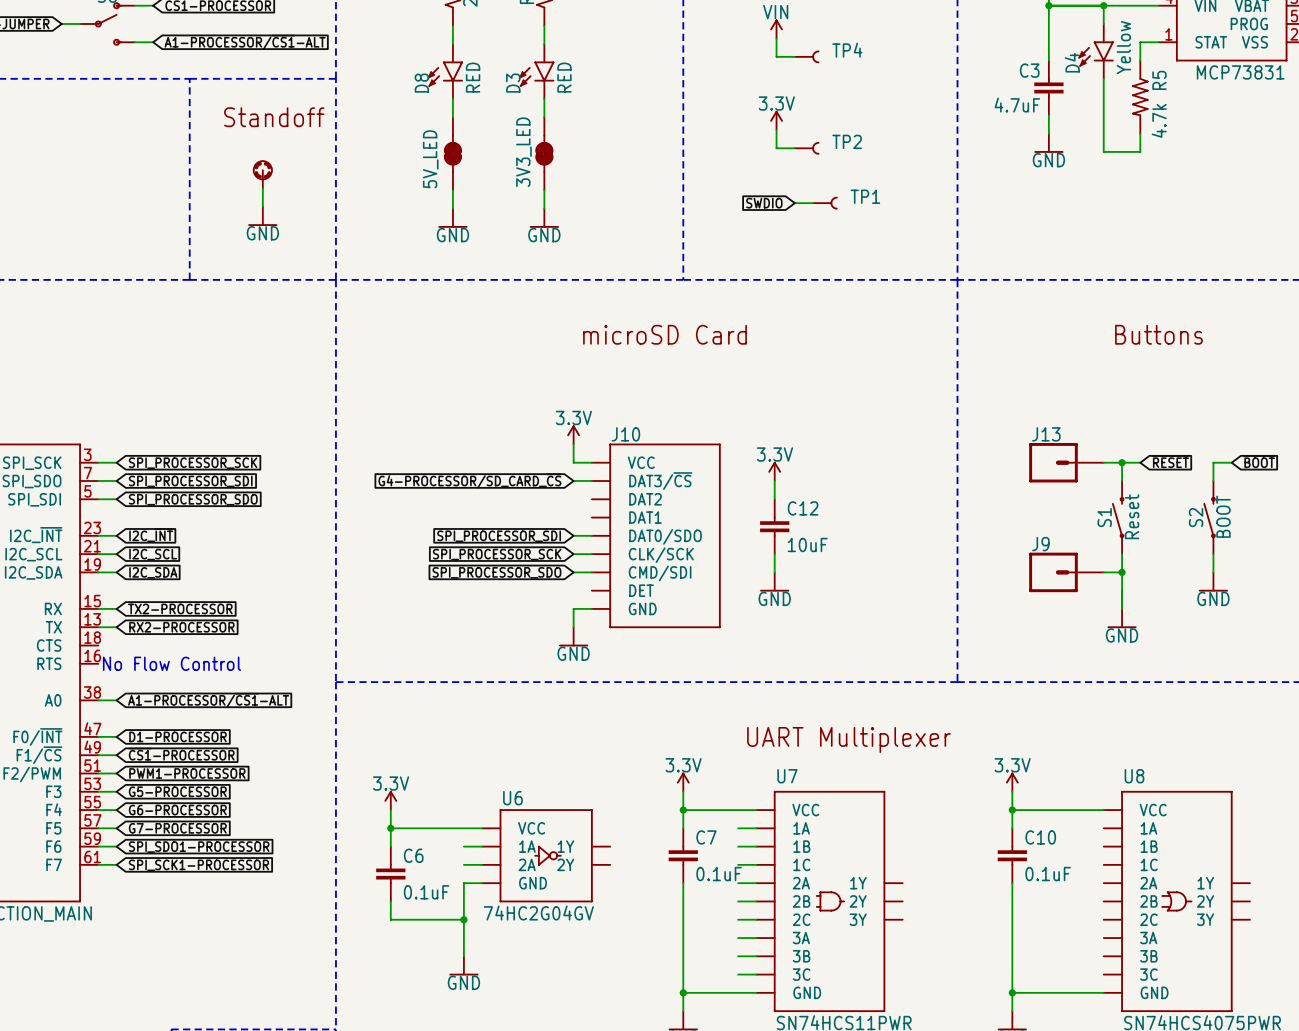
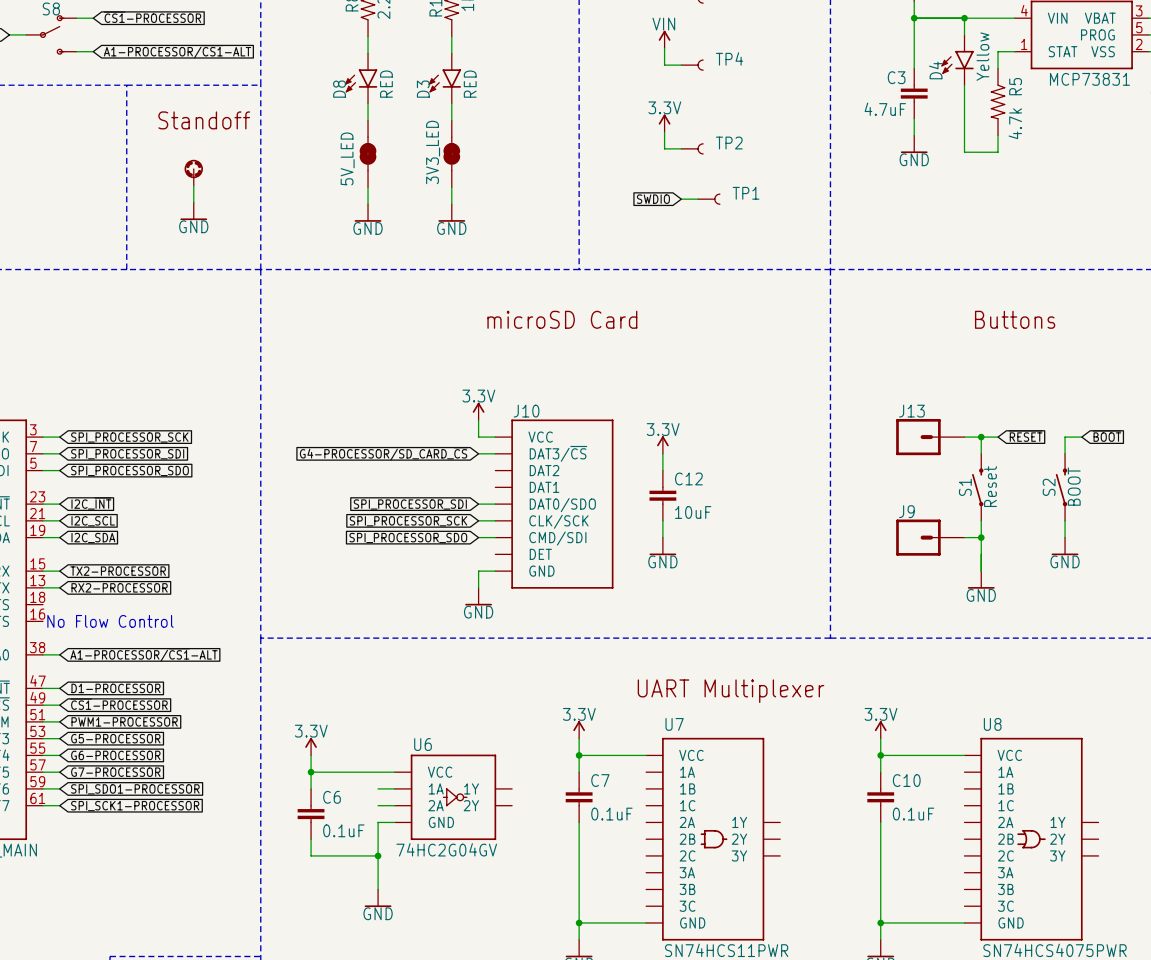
wire: (738, 828) (756, 828) -> none
wire: (738, 846) (756, 846) -> none
wire: (738, 864) (756, 864) -> none
wire: (738, 883) (756, 883) -> none
wire: (738, 901) (756, 901) -> none
wire: (738, 919) (756, 919) -> none
wire: (738, 938) (756, 938) -> none
wire: (738, 956) (756, 956) -> none
wire: (738, 974) (756, 974) -> none

